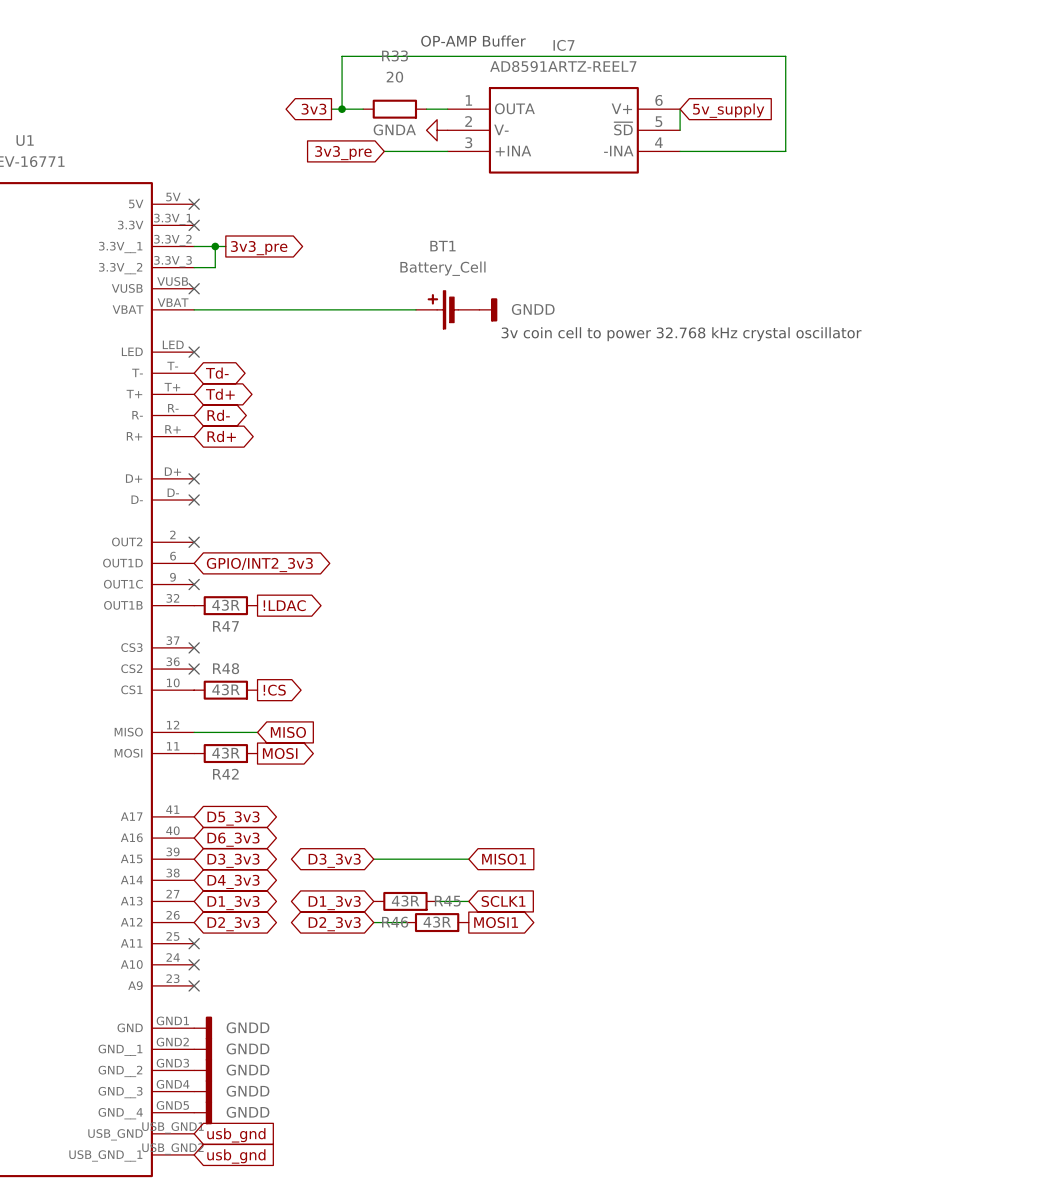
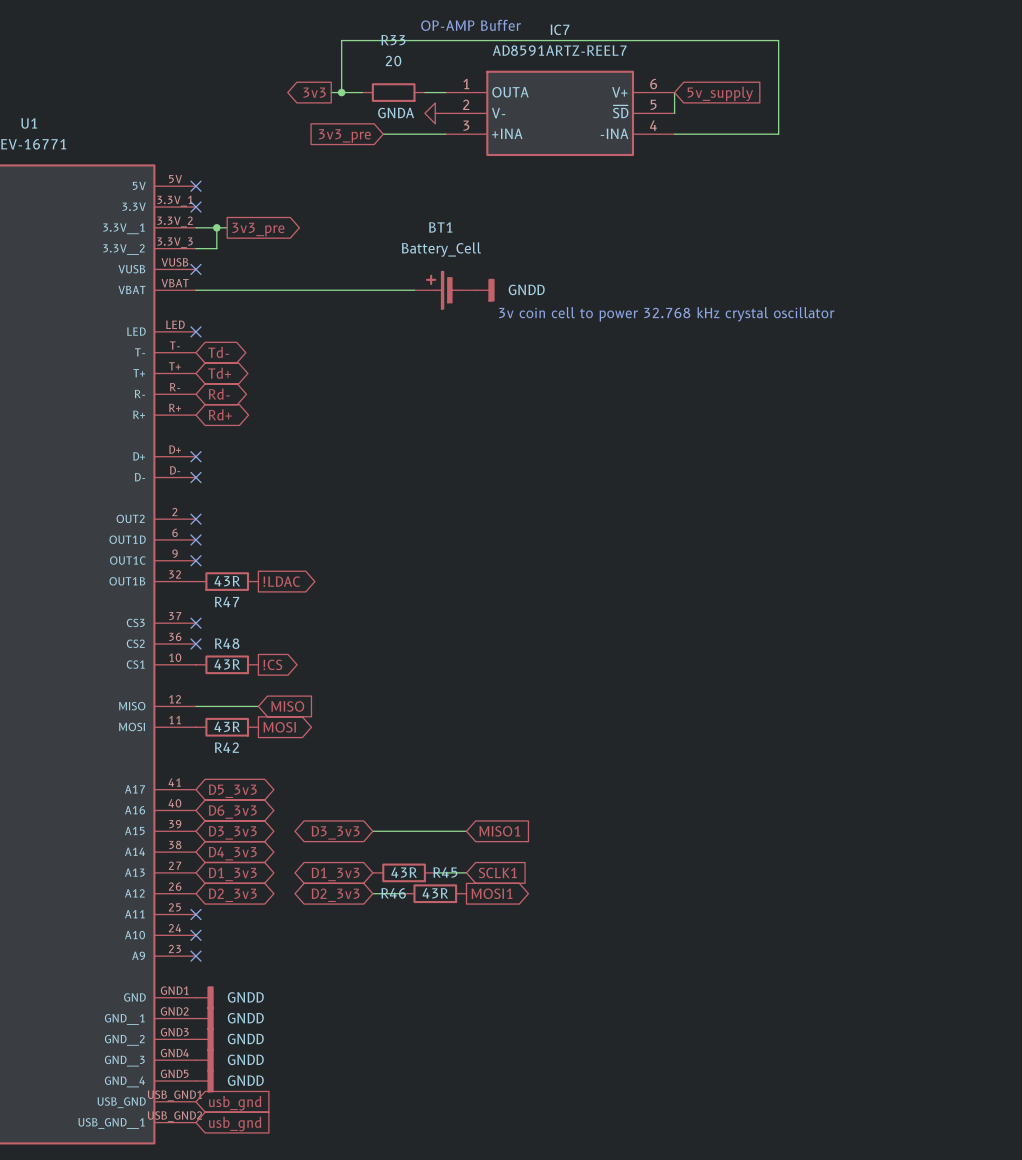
no-connect mark: none -> (195, 539)
global label: GPIO/INT2_3v3 (259, 565) -> none

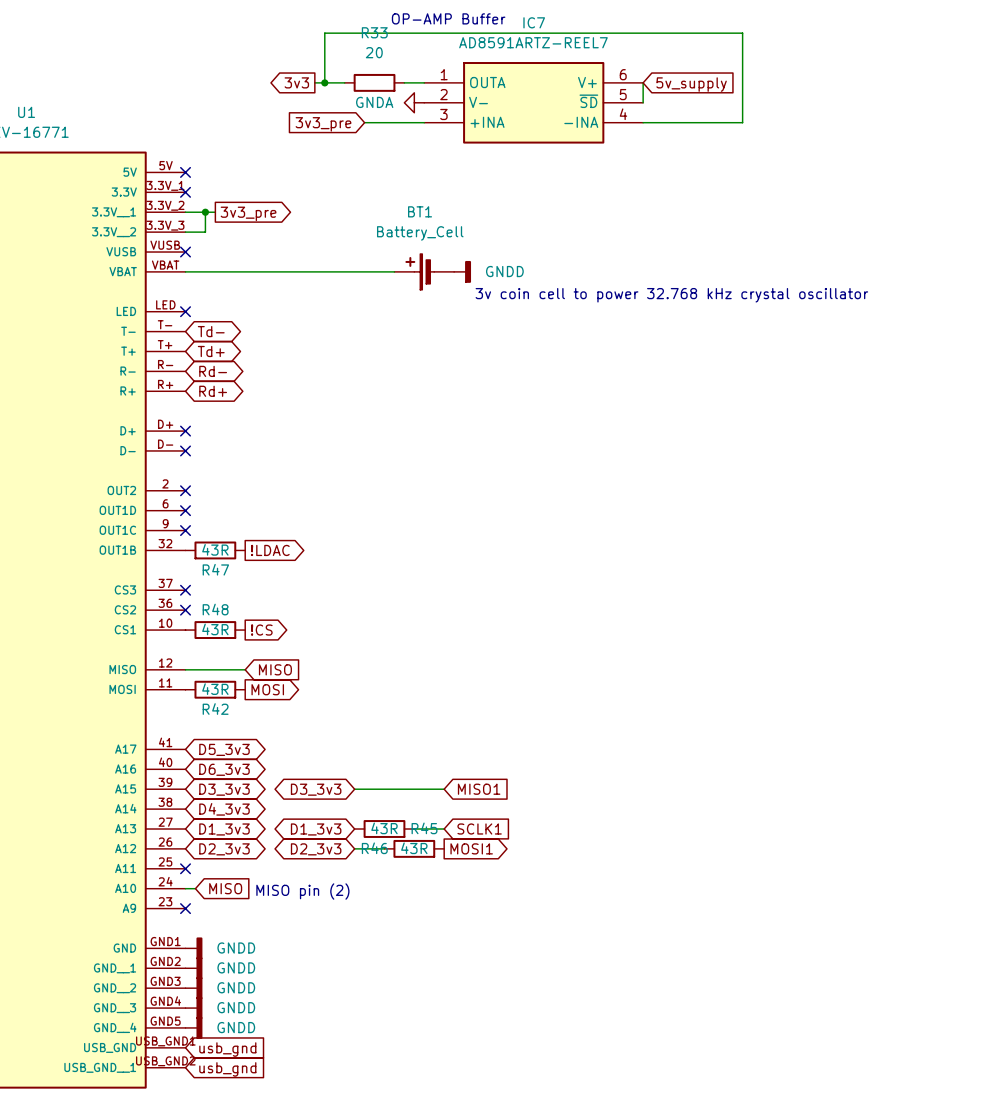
wire: none -> (185, 888) (195, 888)
no-connect mark: (195, 935) -> none
global label: none -> MISO (225, 888)
text: none -> MISO pin (2) (302, 891)

